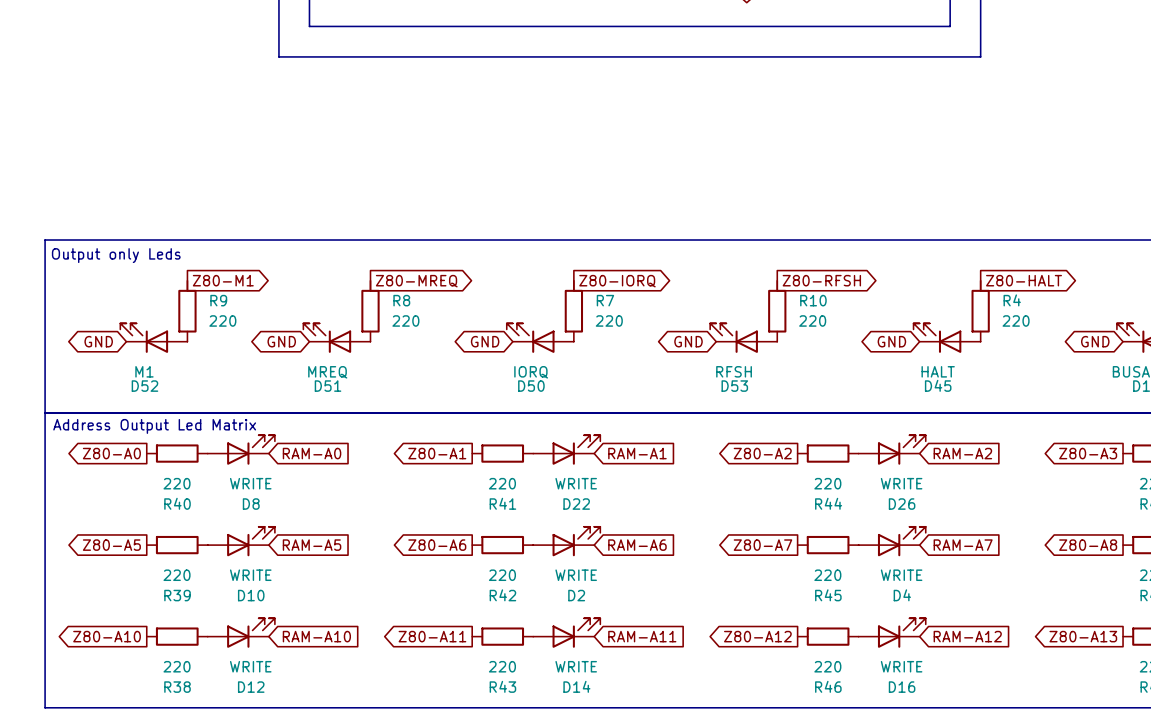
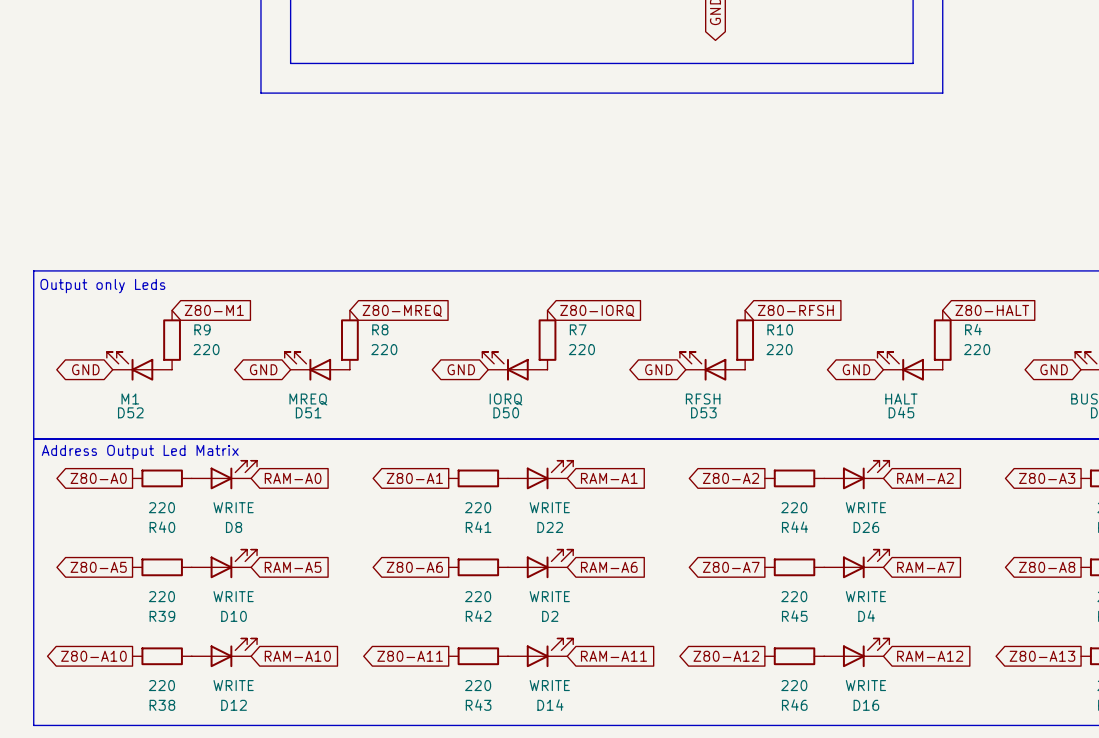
global label shape: output (223, 280) -> input (214, 310)
global label shape: output (821, 280) -> input (795, 310)
global label shape: output (1024, 280) -> input (992, 310)
global label shape: output (416, 281) -> input (402, 310)
global label shape: output (617, 281) -> input (597, 310)

